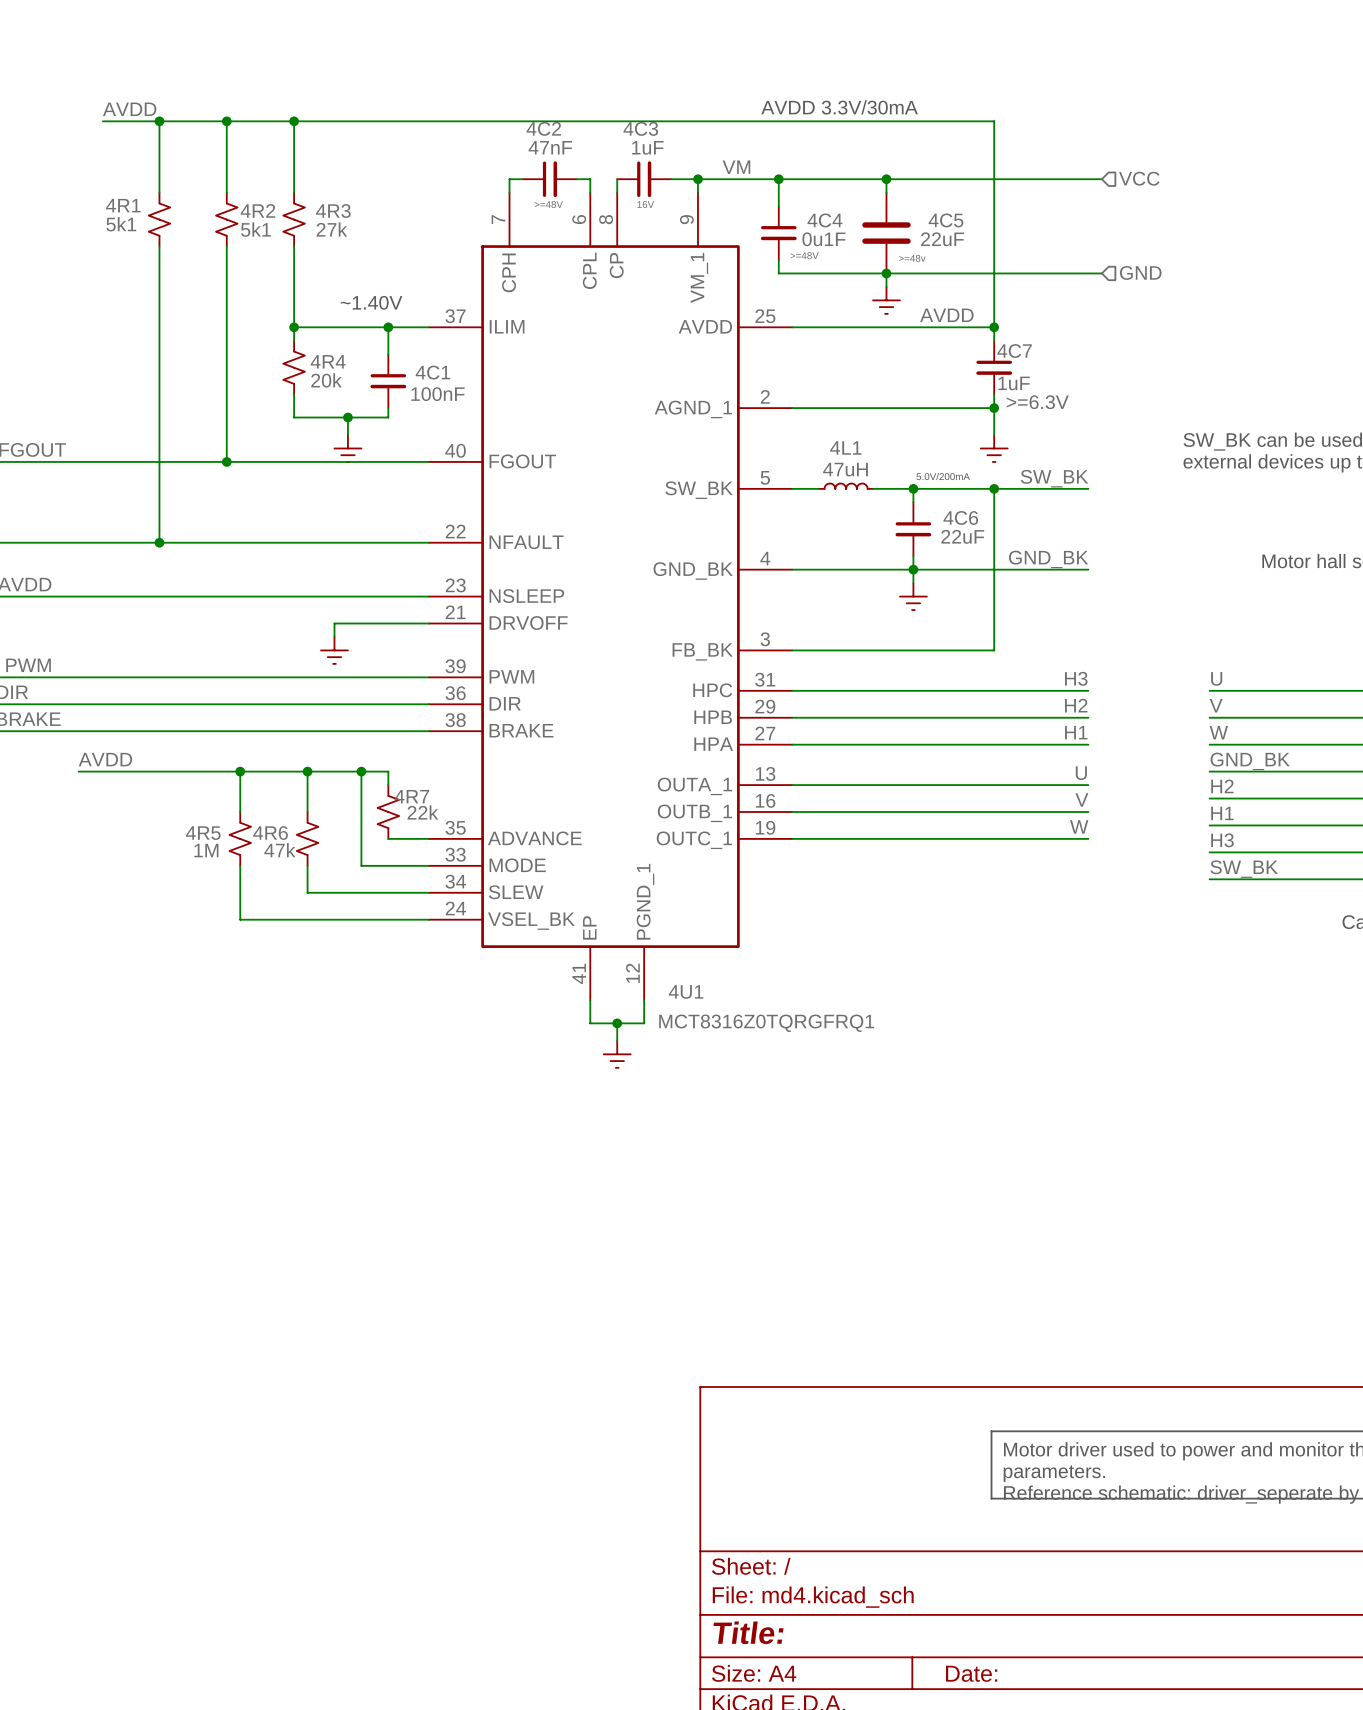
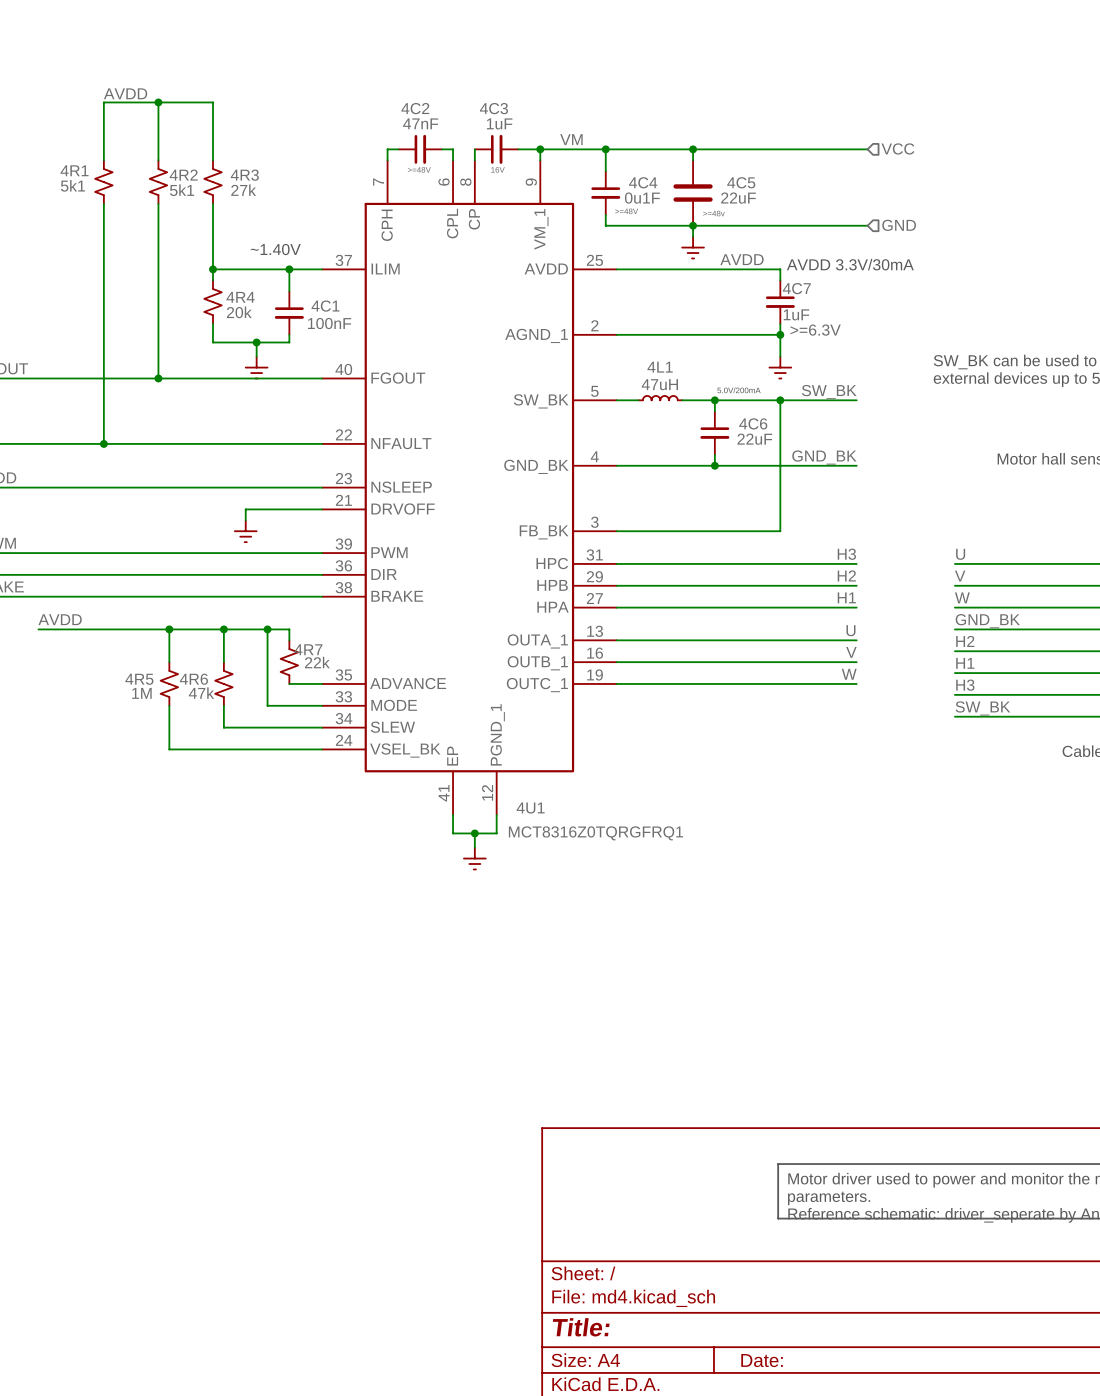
text: AVDD 3.3V/30mA (839, 107) -> none
label position: AVDD (129, 109) -> AVDD (125, 93)
wire: (102, 121) (159, 121) -> none
junction: (159, 121) -> none
wire: (294, 121) (994, 121) (994, 327) -> none
junction: (294, 121) -> none
text: none -> AVDD 3.3V/30mA (850, 264)
junction: (994, 327) -> none
wire: (913, 569) (913, 583) -> none
power symbol: (913, 596) -> none

